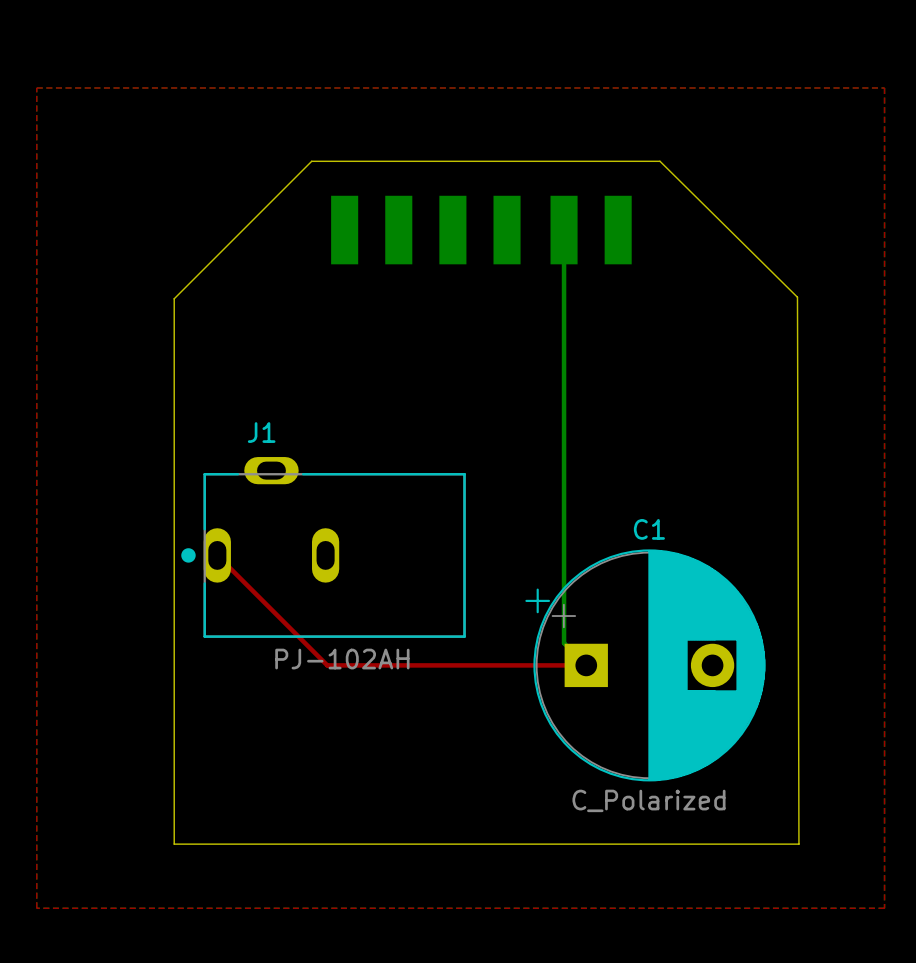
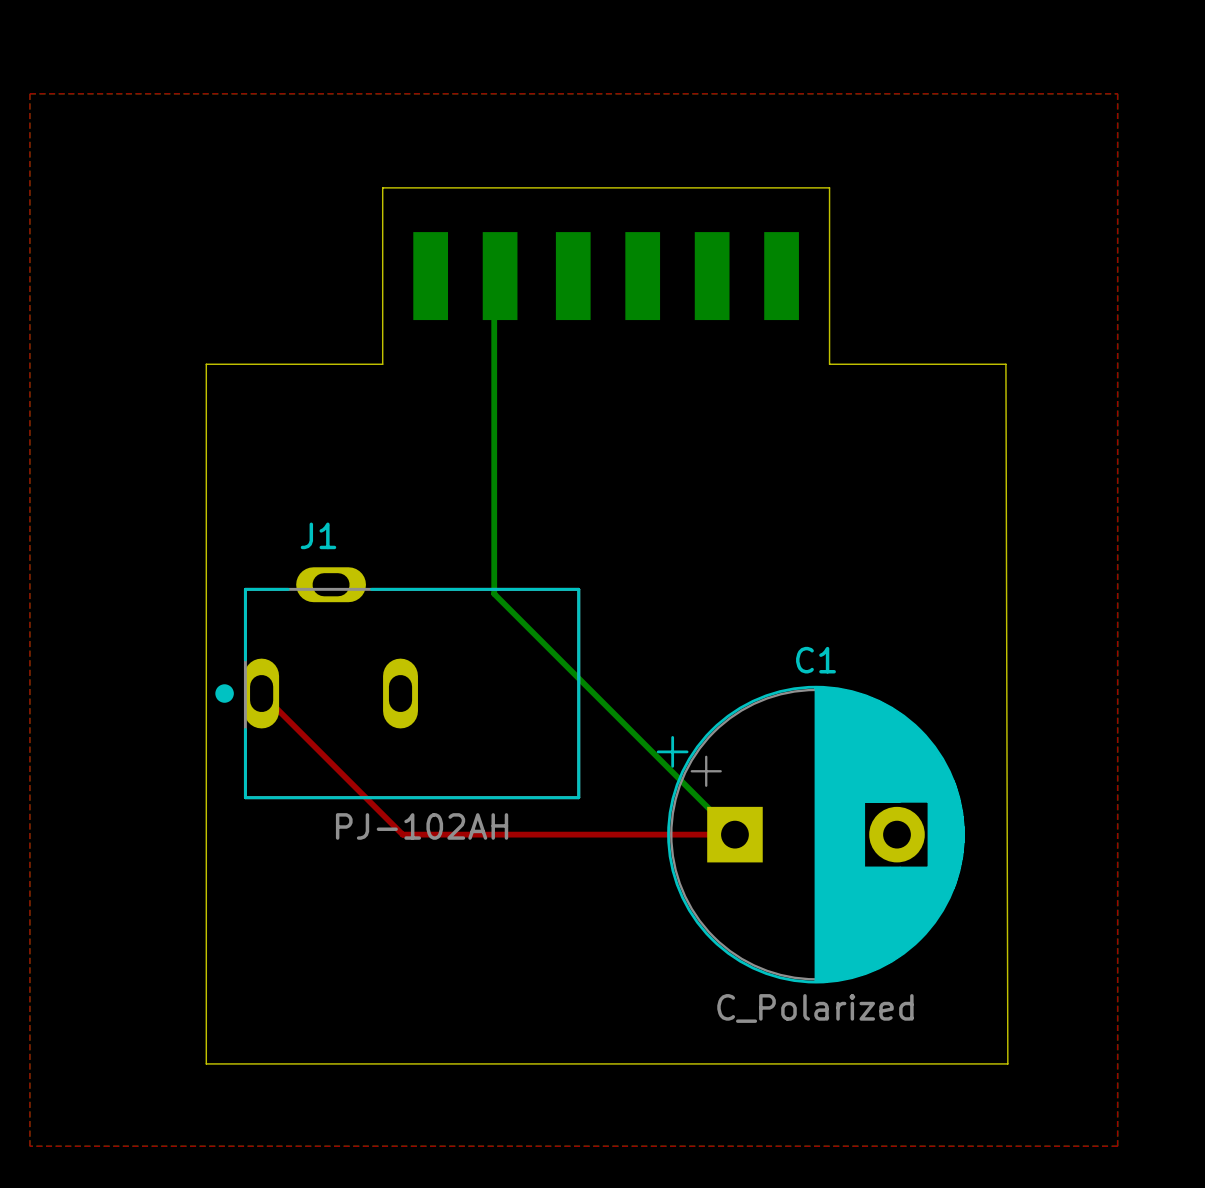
board edge: (311, 161) (174, 298) -> (382, 187) (382, 364) (206, 364)
board edge: (659, 161) (797, 298) -> (829, 187) (829, 364) (1005, 364)
part rotation: 0° (481, 230) -> 180° (606, 276)
bottom track: (564, 230) (564, 643) -> (494, 276) (494, 593) (706, 806)

